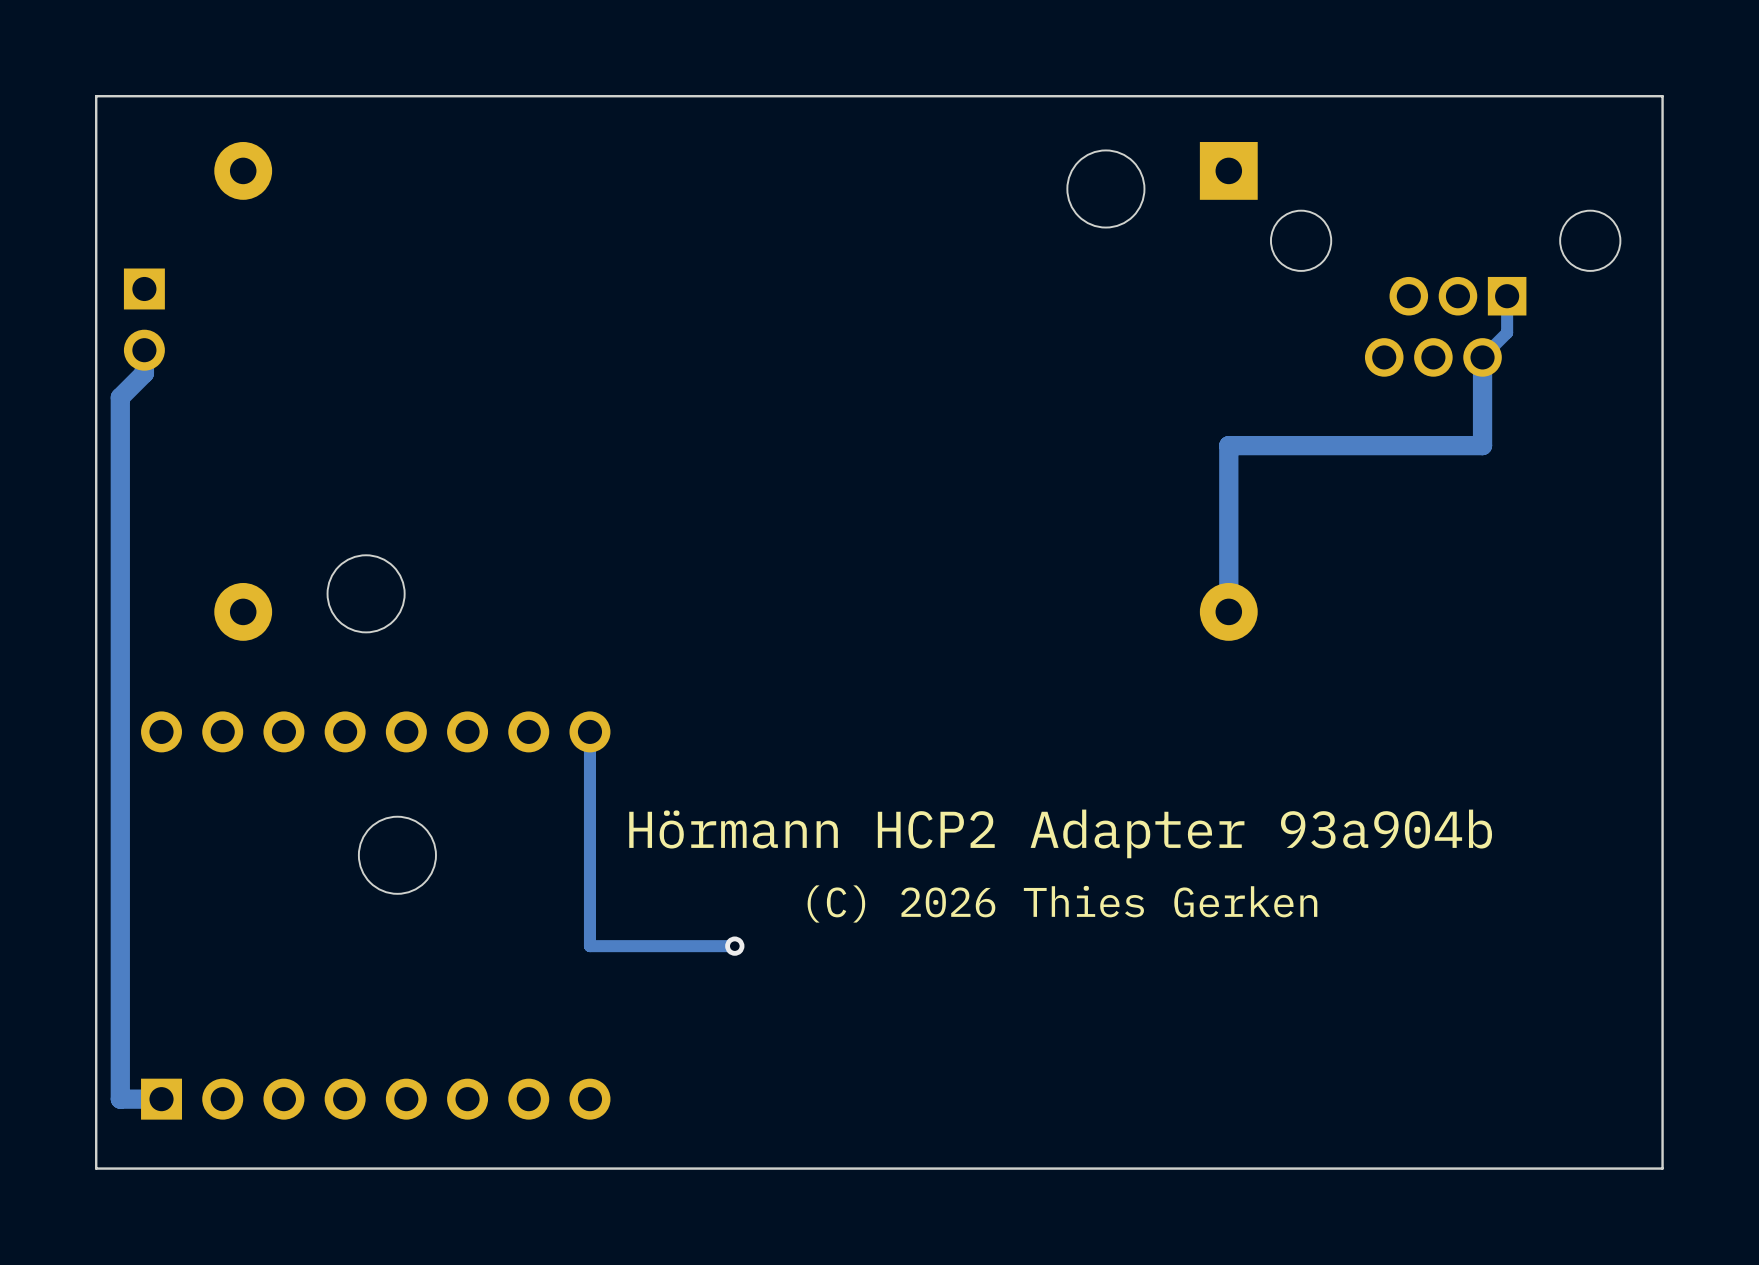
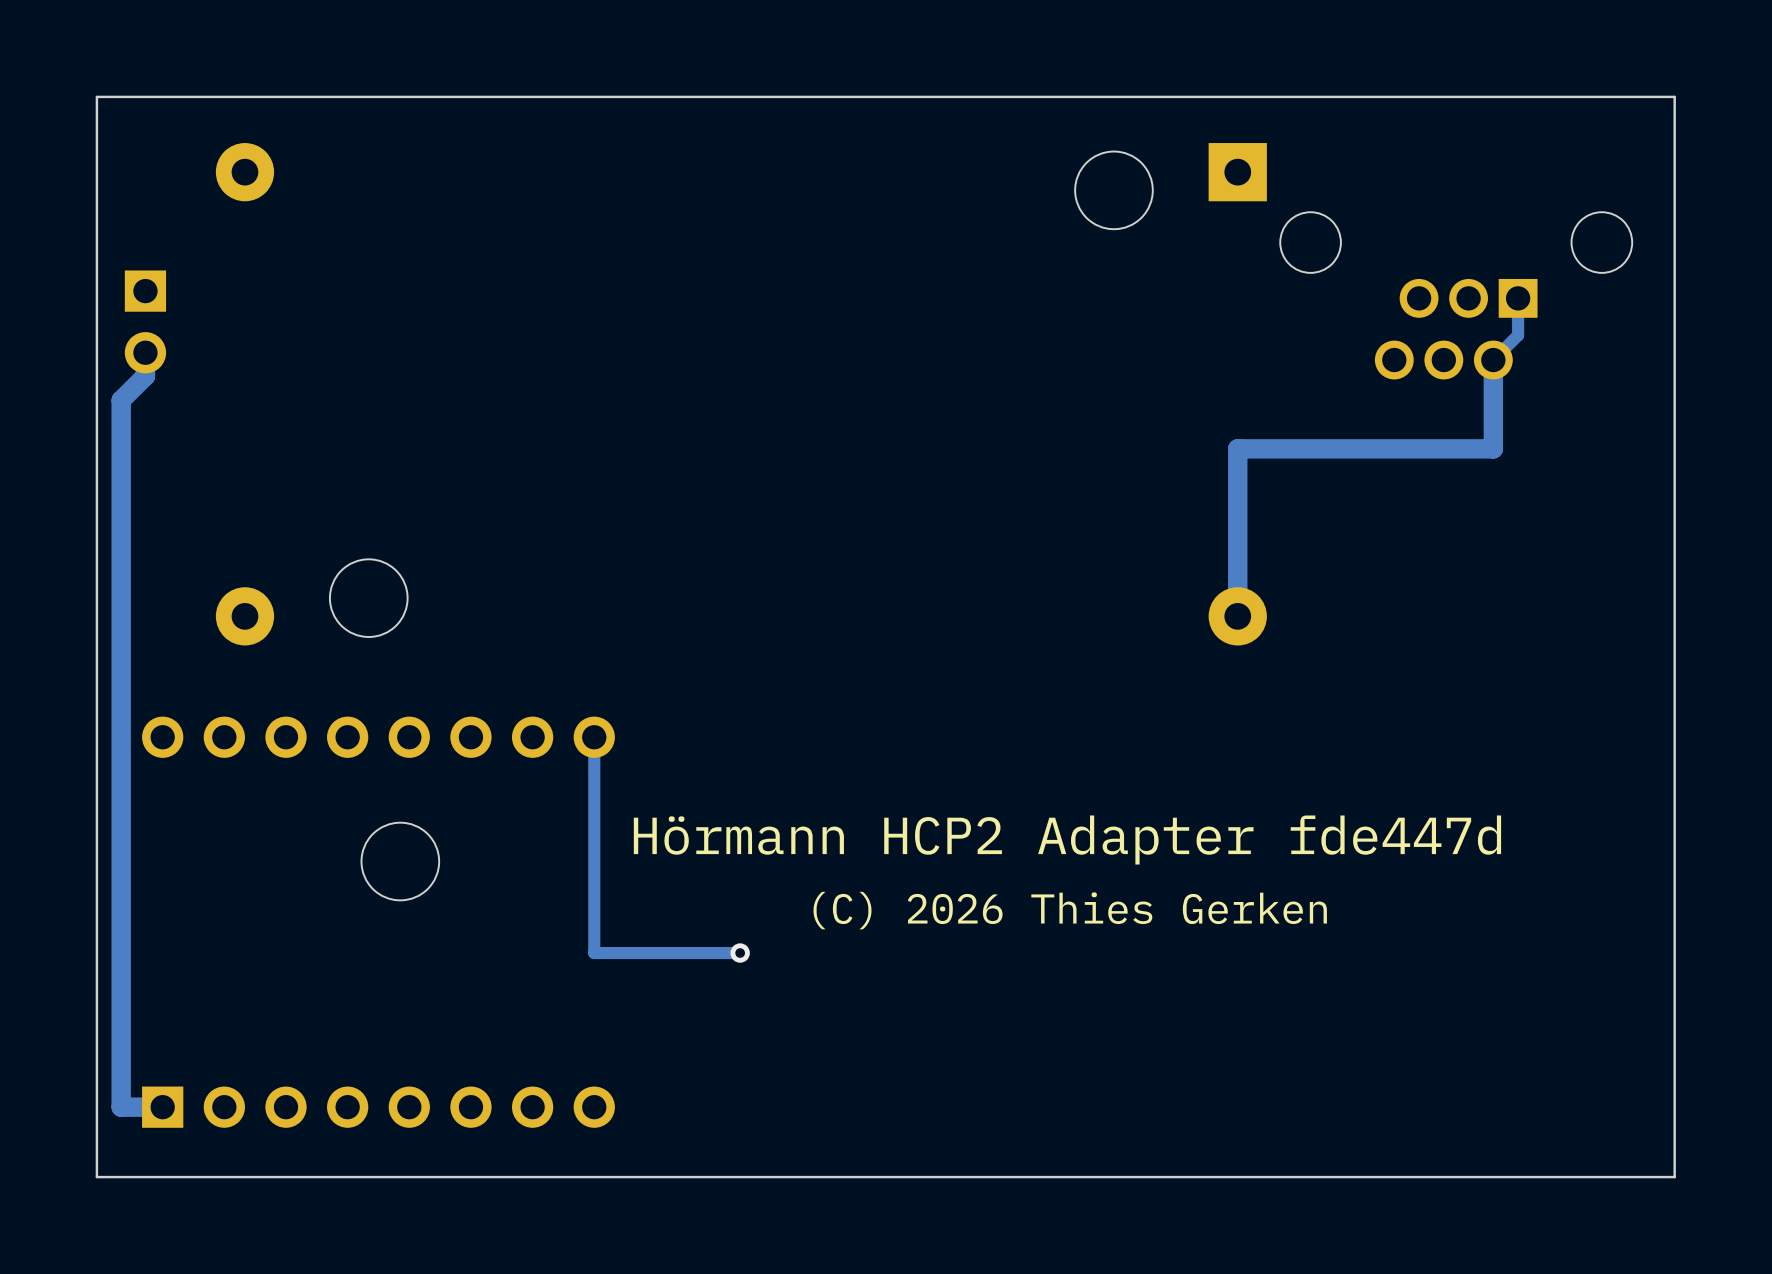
text: Hörmann HCP2 Adapter 93a904b (1060, 833) -> Hörmann HCP2 Adapter fde447d (1067, 840)

